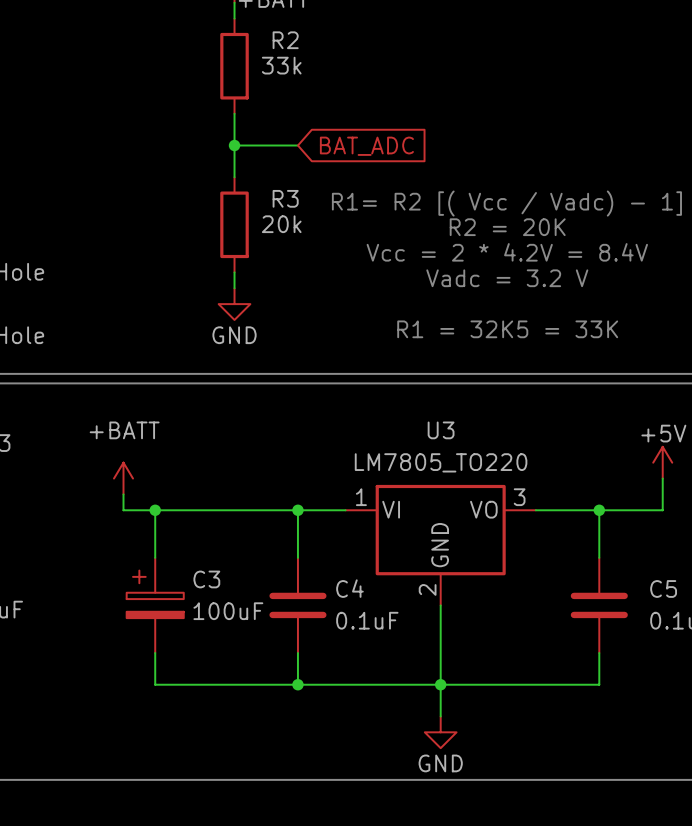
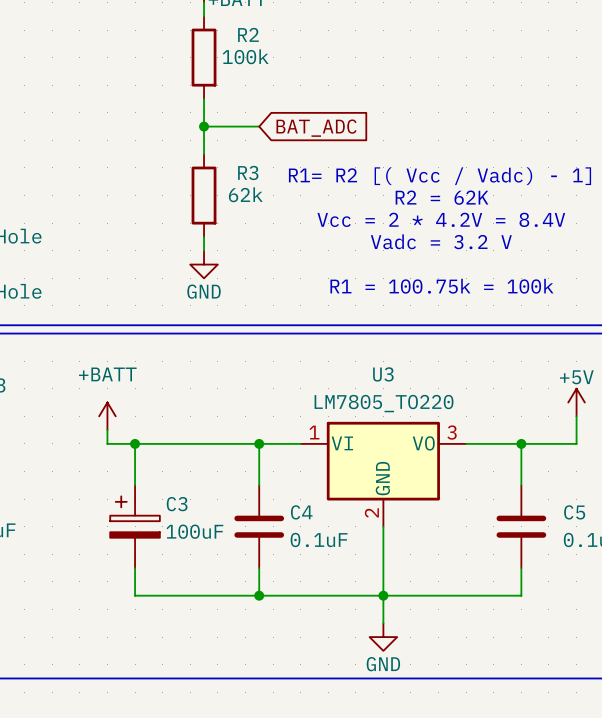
R2 value: 33k (281, 65) -> 100k (245, 56)
R3 value: 20k (281, 224) -> 62k (245, 194)
text: R2 = 20K (507, 227) -> R2 = 62K (442, 197)
text: R1 = 32K5 = 33K (507, 329) -> R1 = 100.75k = 100k (441, 286)

